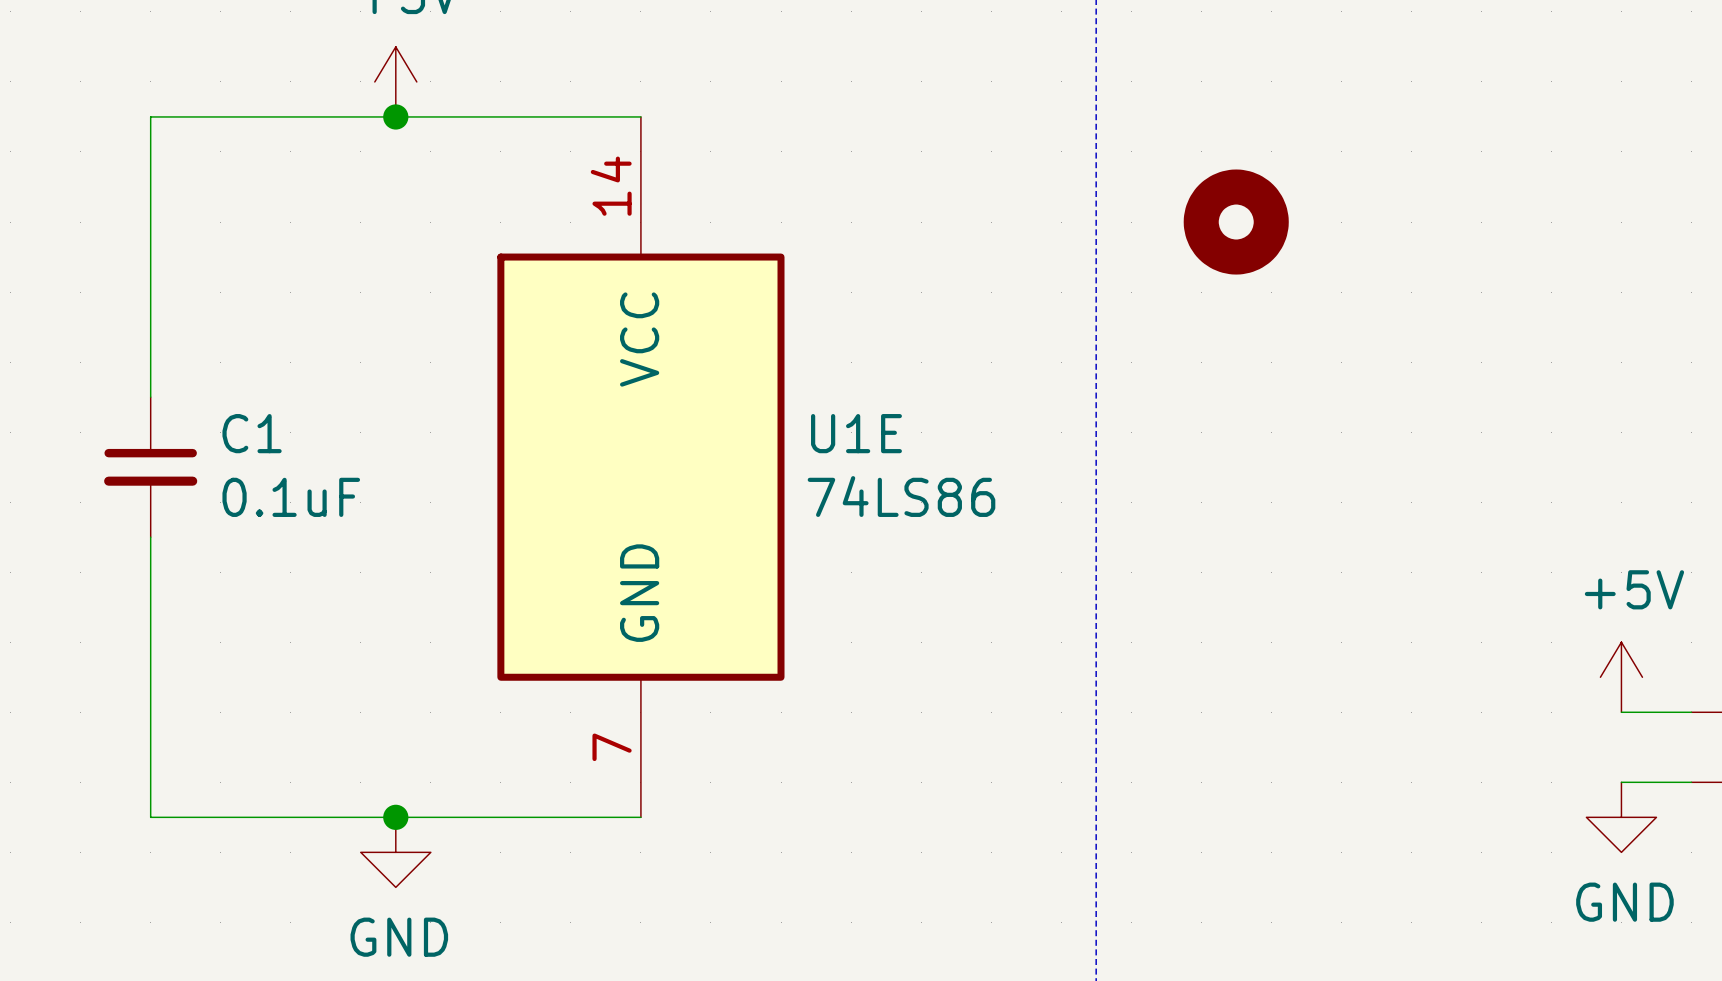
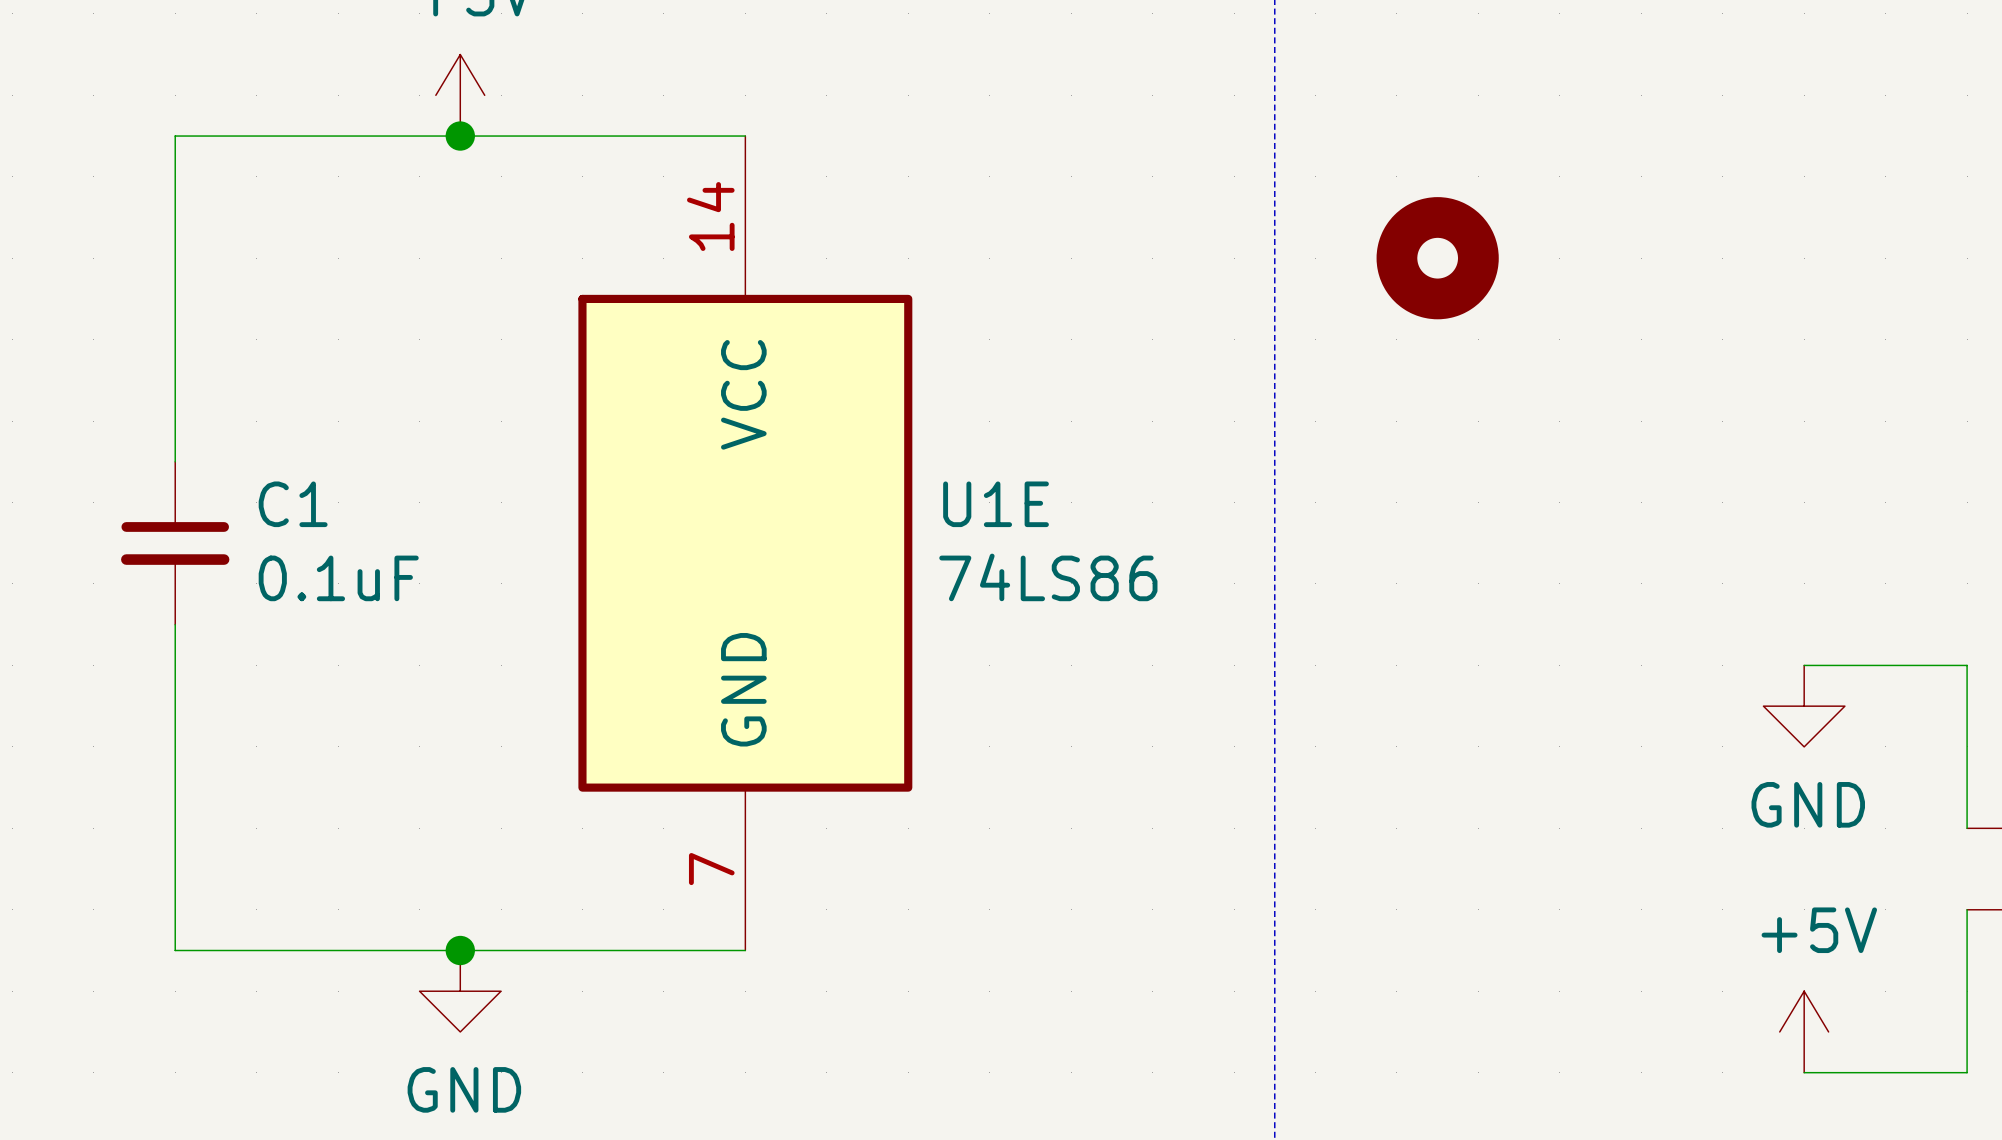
power symbol position: +5V (1621, 677) -> +5V (1804, 1031)
wire: (1621, 712) (1691, 712) -> (1804, 665) (1967, 665) (1967, 828)
wire: (1621, 782) (1691, 782) -> (1804, 1072) (1967, 1072) (1967, 909)
power symbol position: GND (1621, 817) -> GND (1804, 706)

